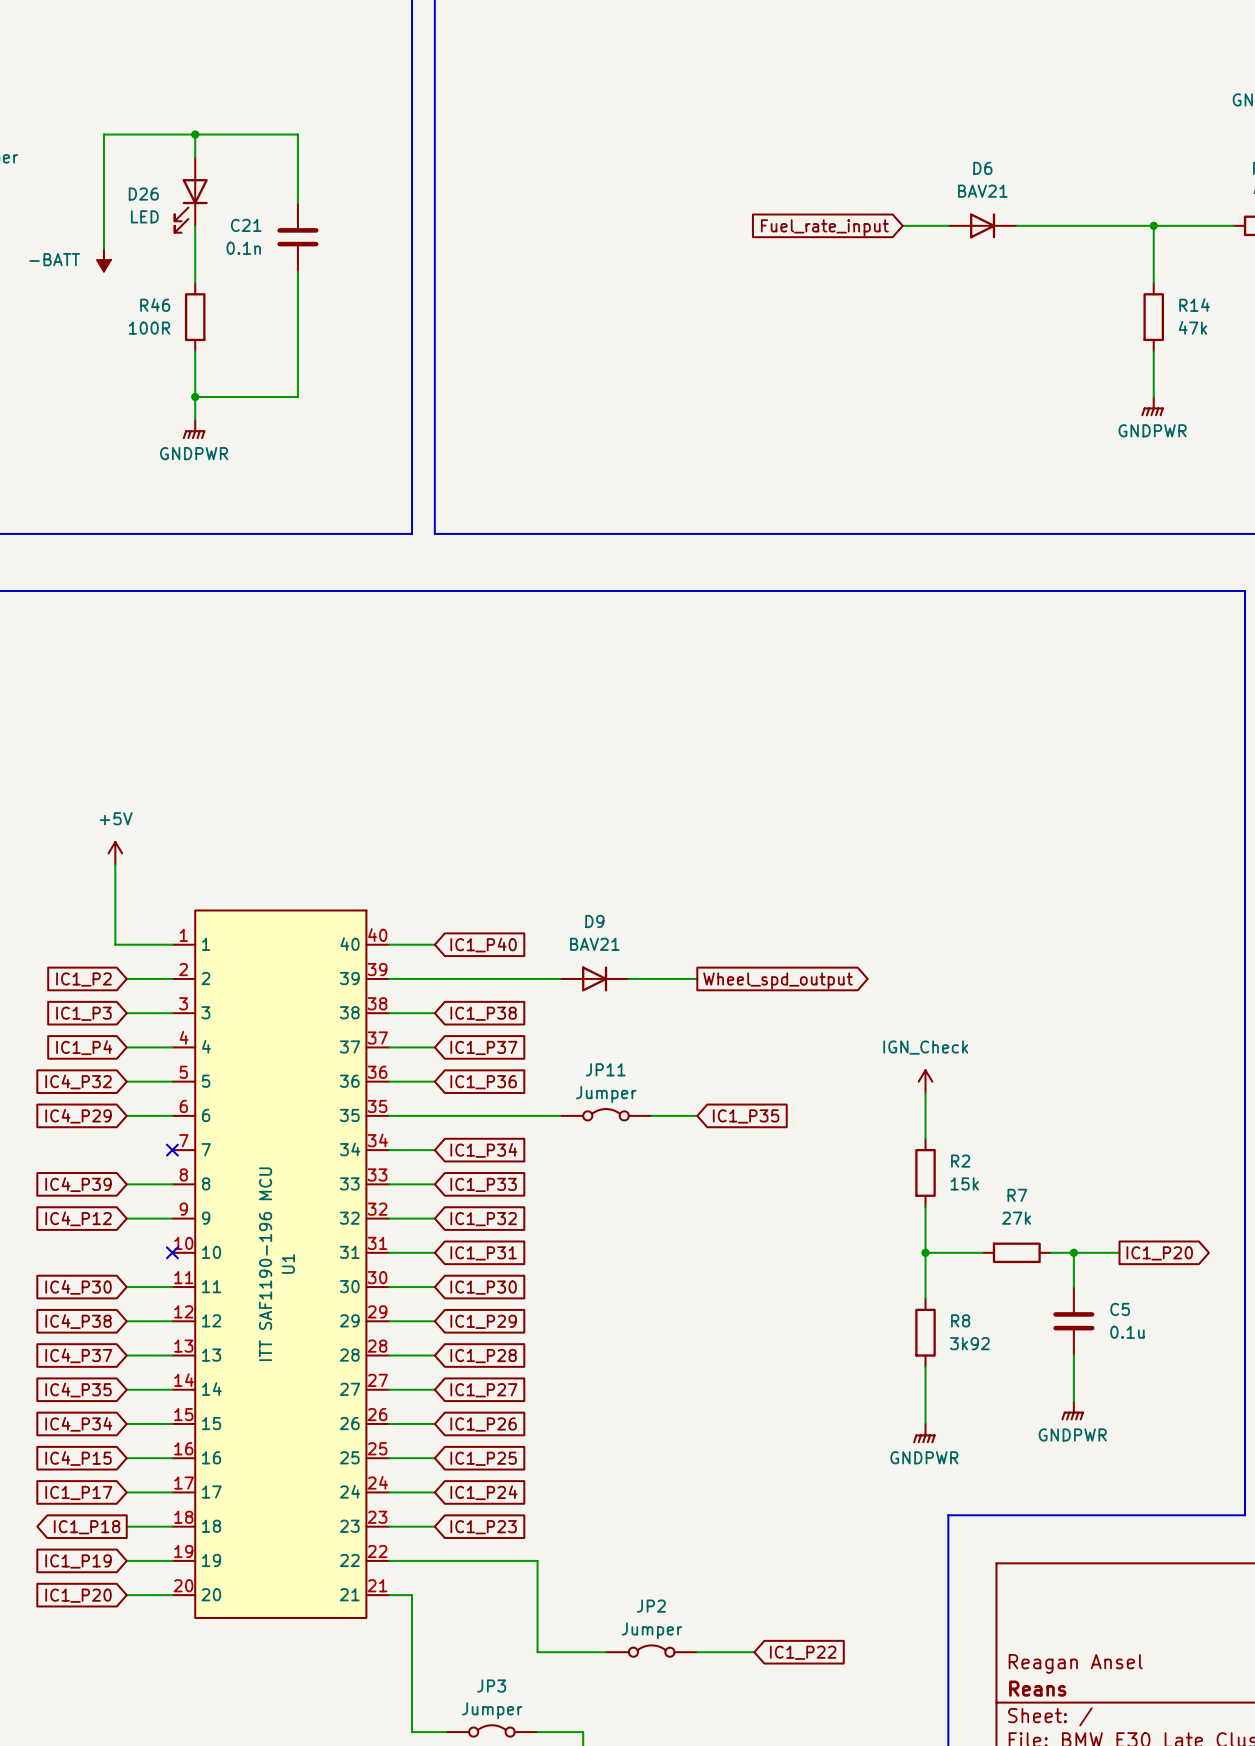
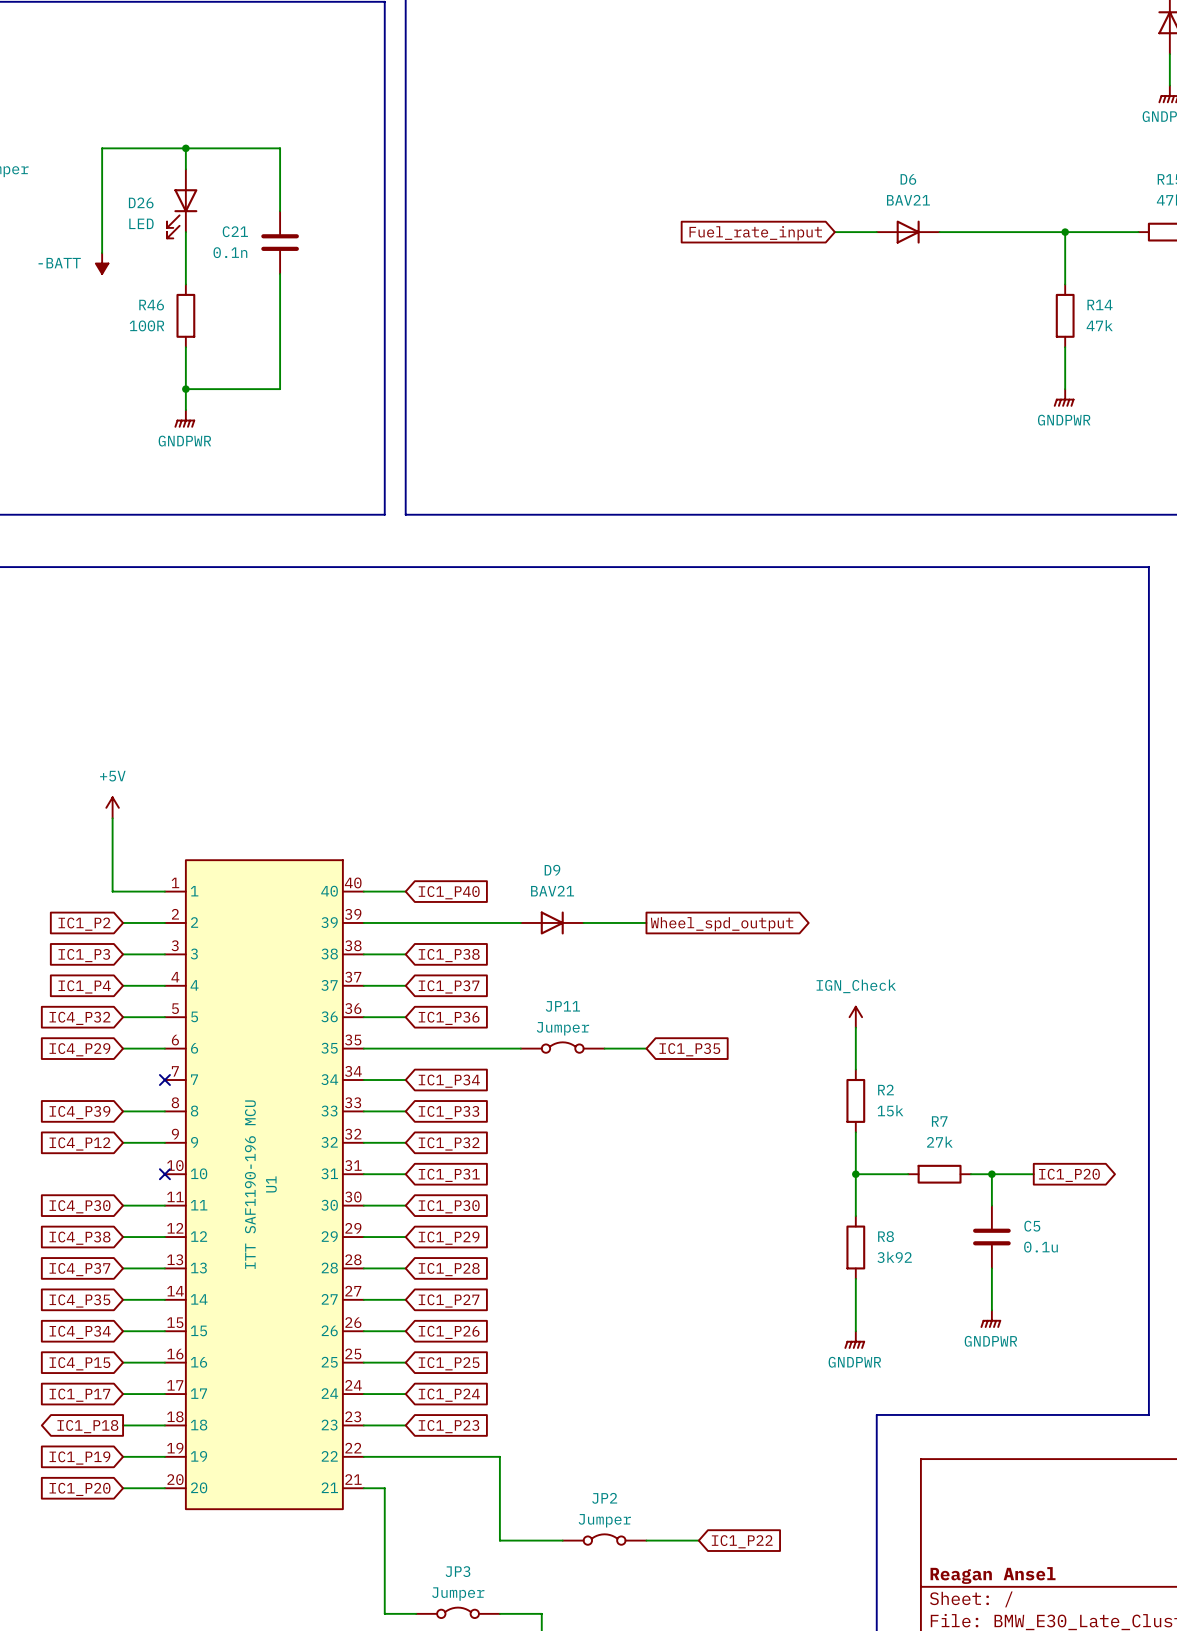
title block: Reagan Ansel (1075, 1663) -> none
title block: Reans (1037, 1688) -> Reagan Ansel (993, 1575)

